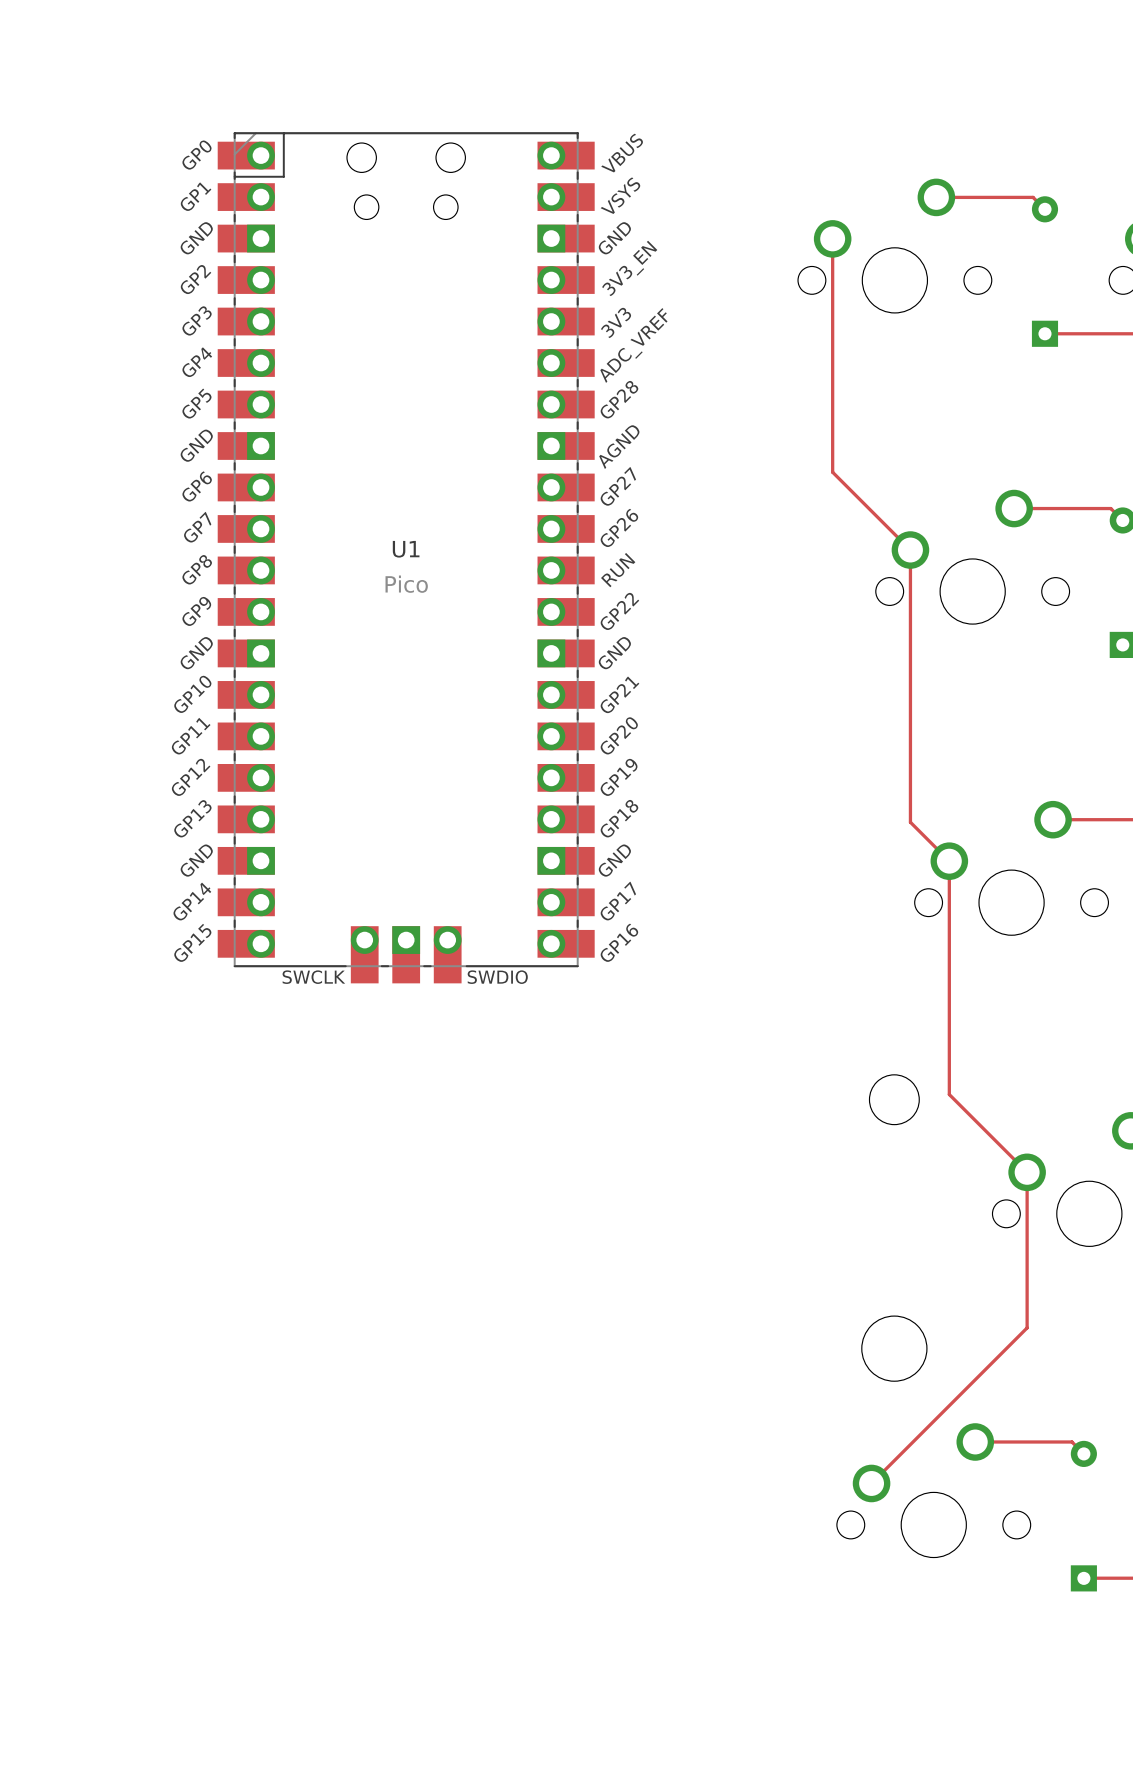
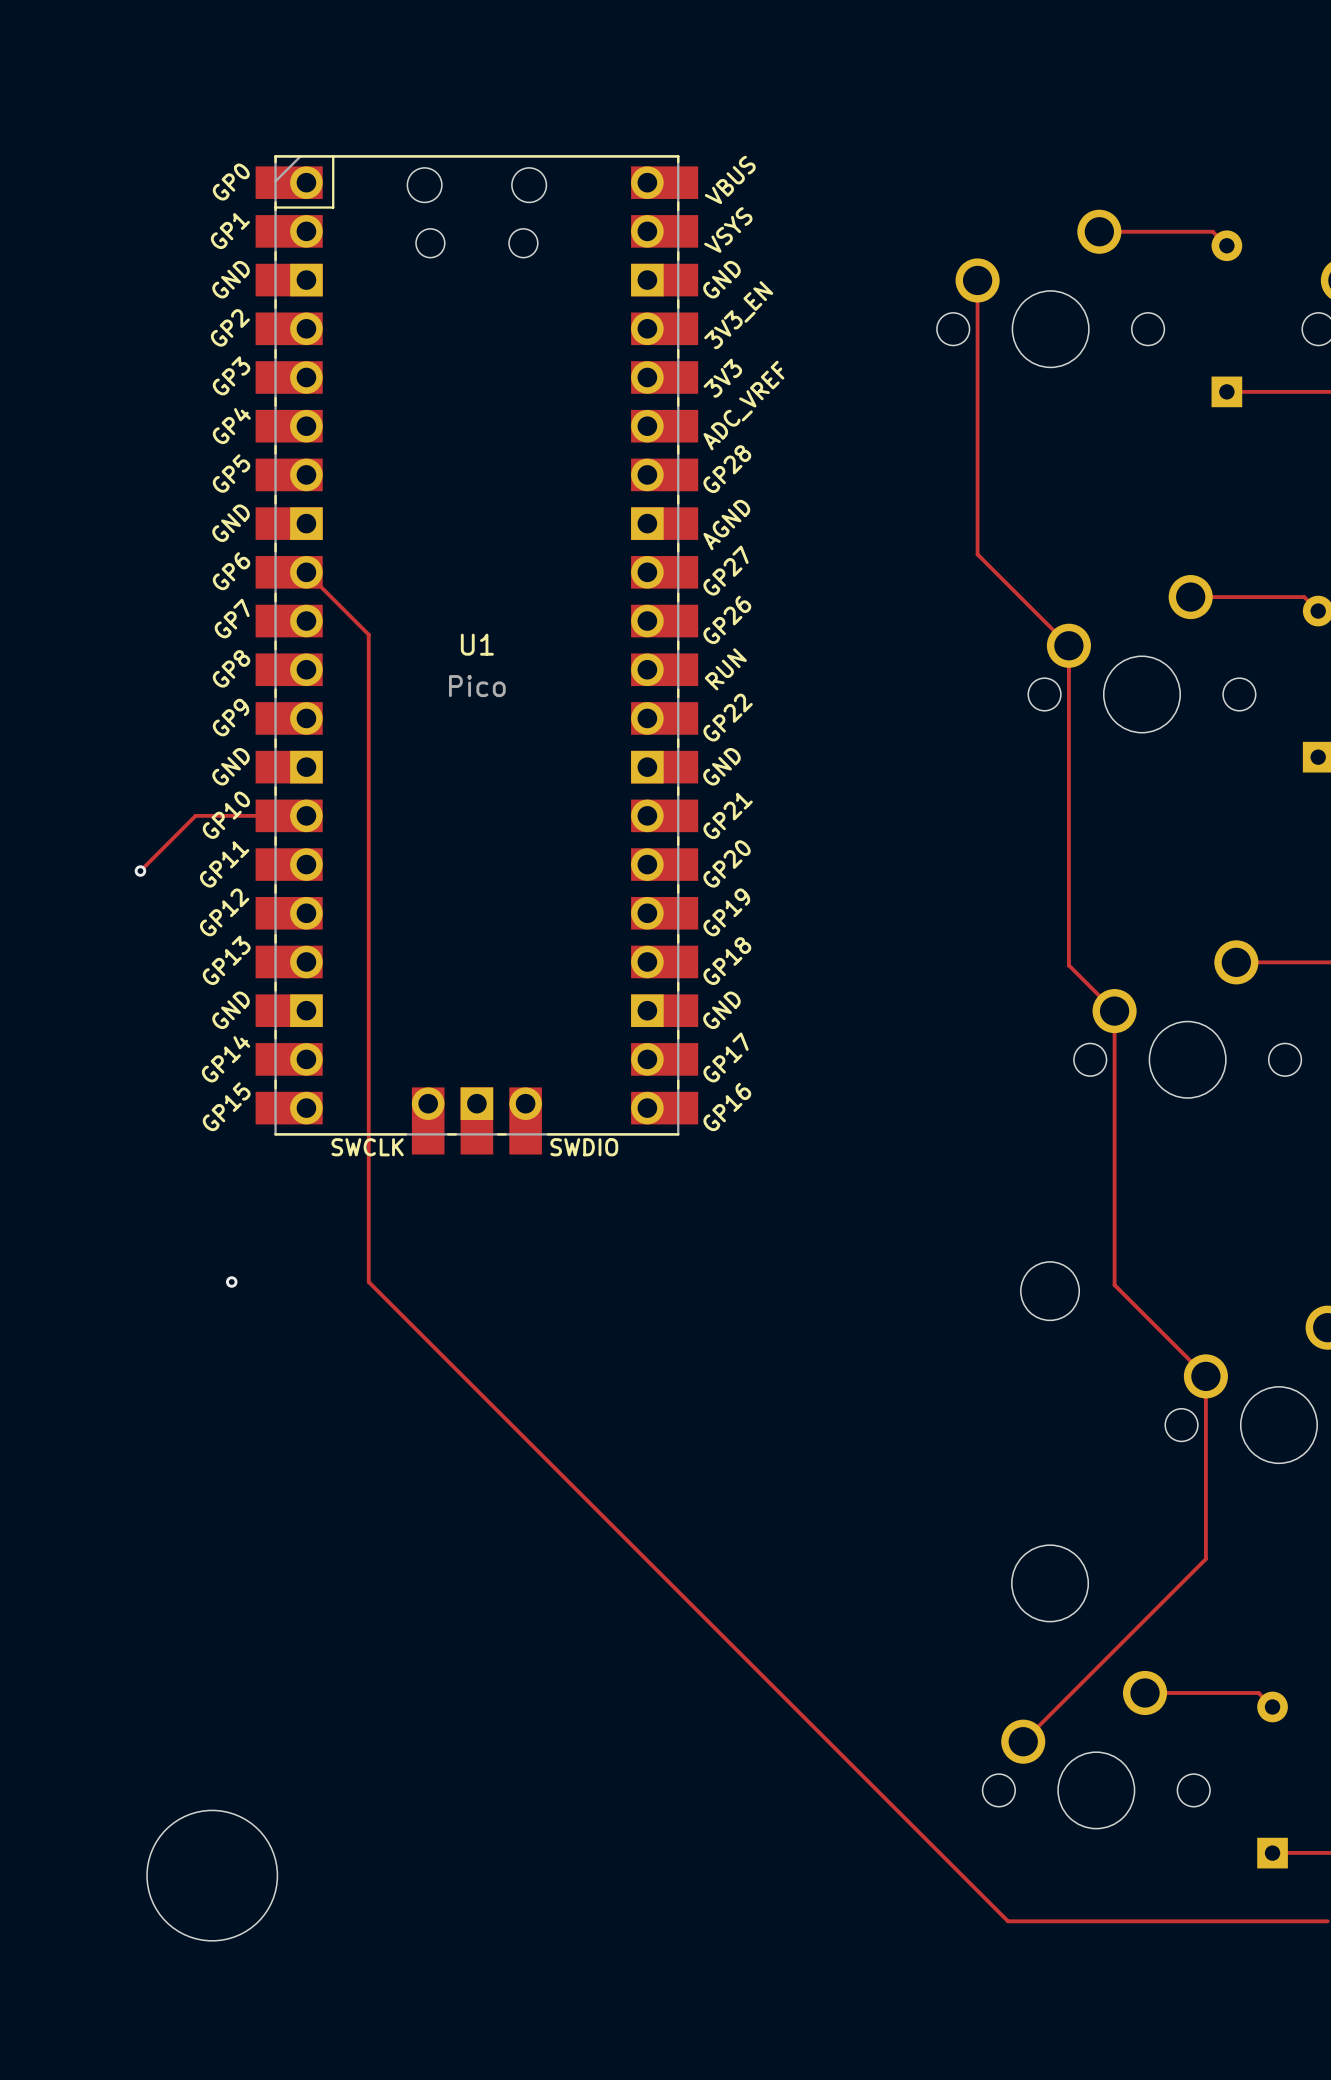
track: none -> (306, 572) (368, 634) (368, 1282) (1008, 1921) (1327, 1921)
track: none -> (306, 815) (195, 815) (140, 871)
via: none -> (140, 871)
via: none -> (231, 1282)
round board edge: none -> [146, 1809, 278, 1942]

